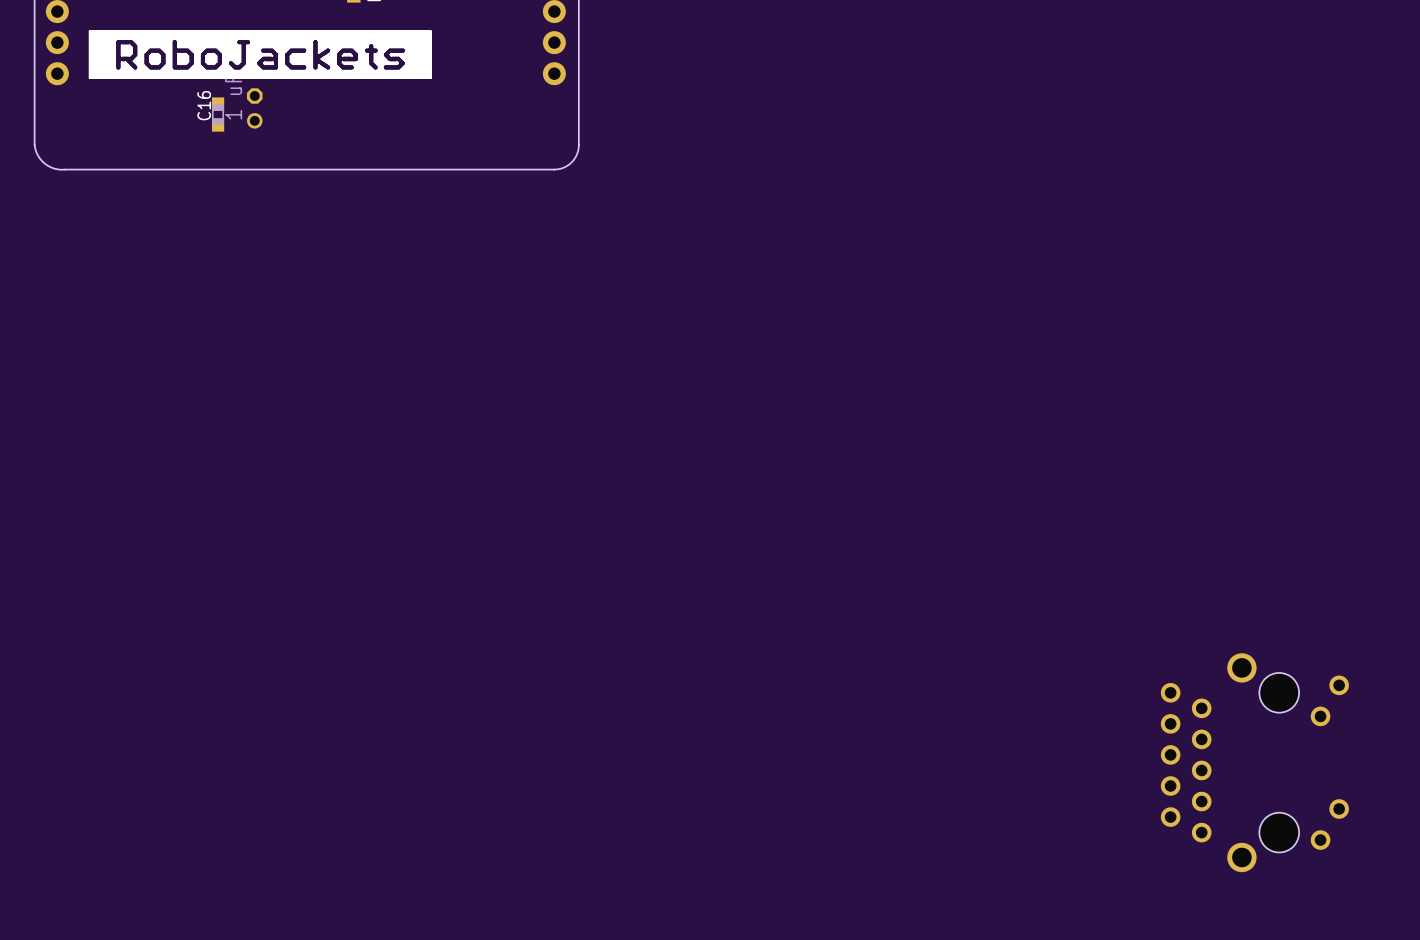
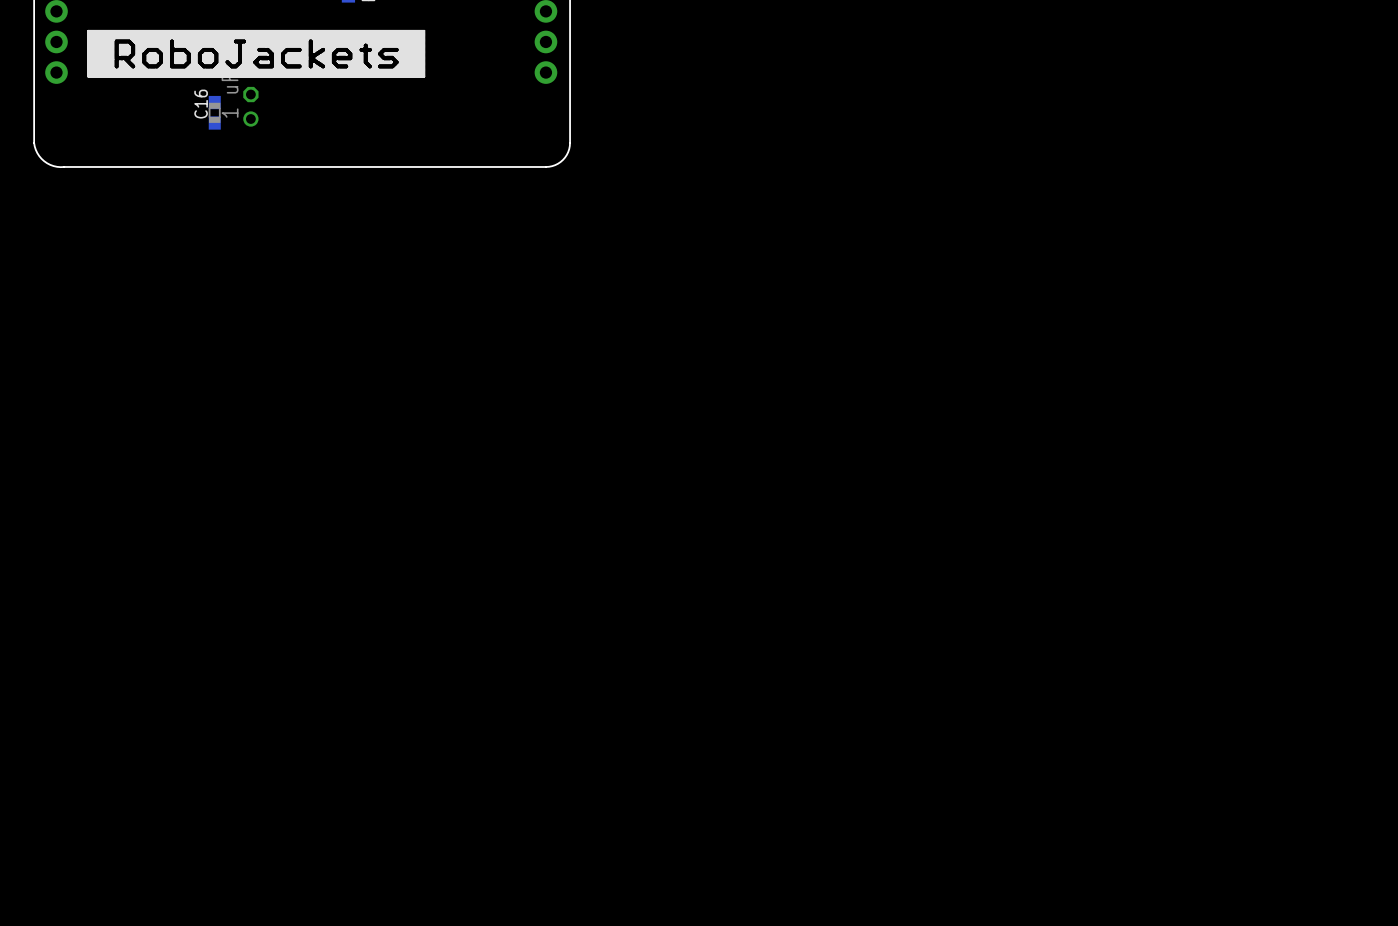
part: (1254, 762) -> none

